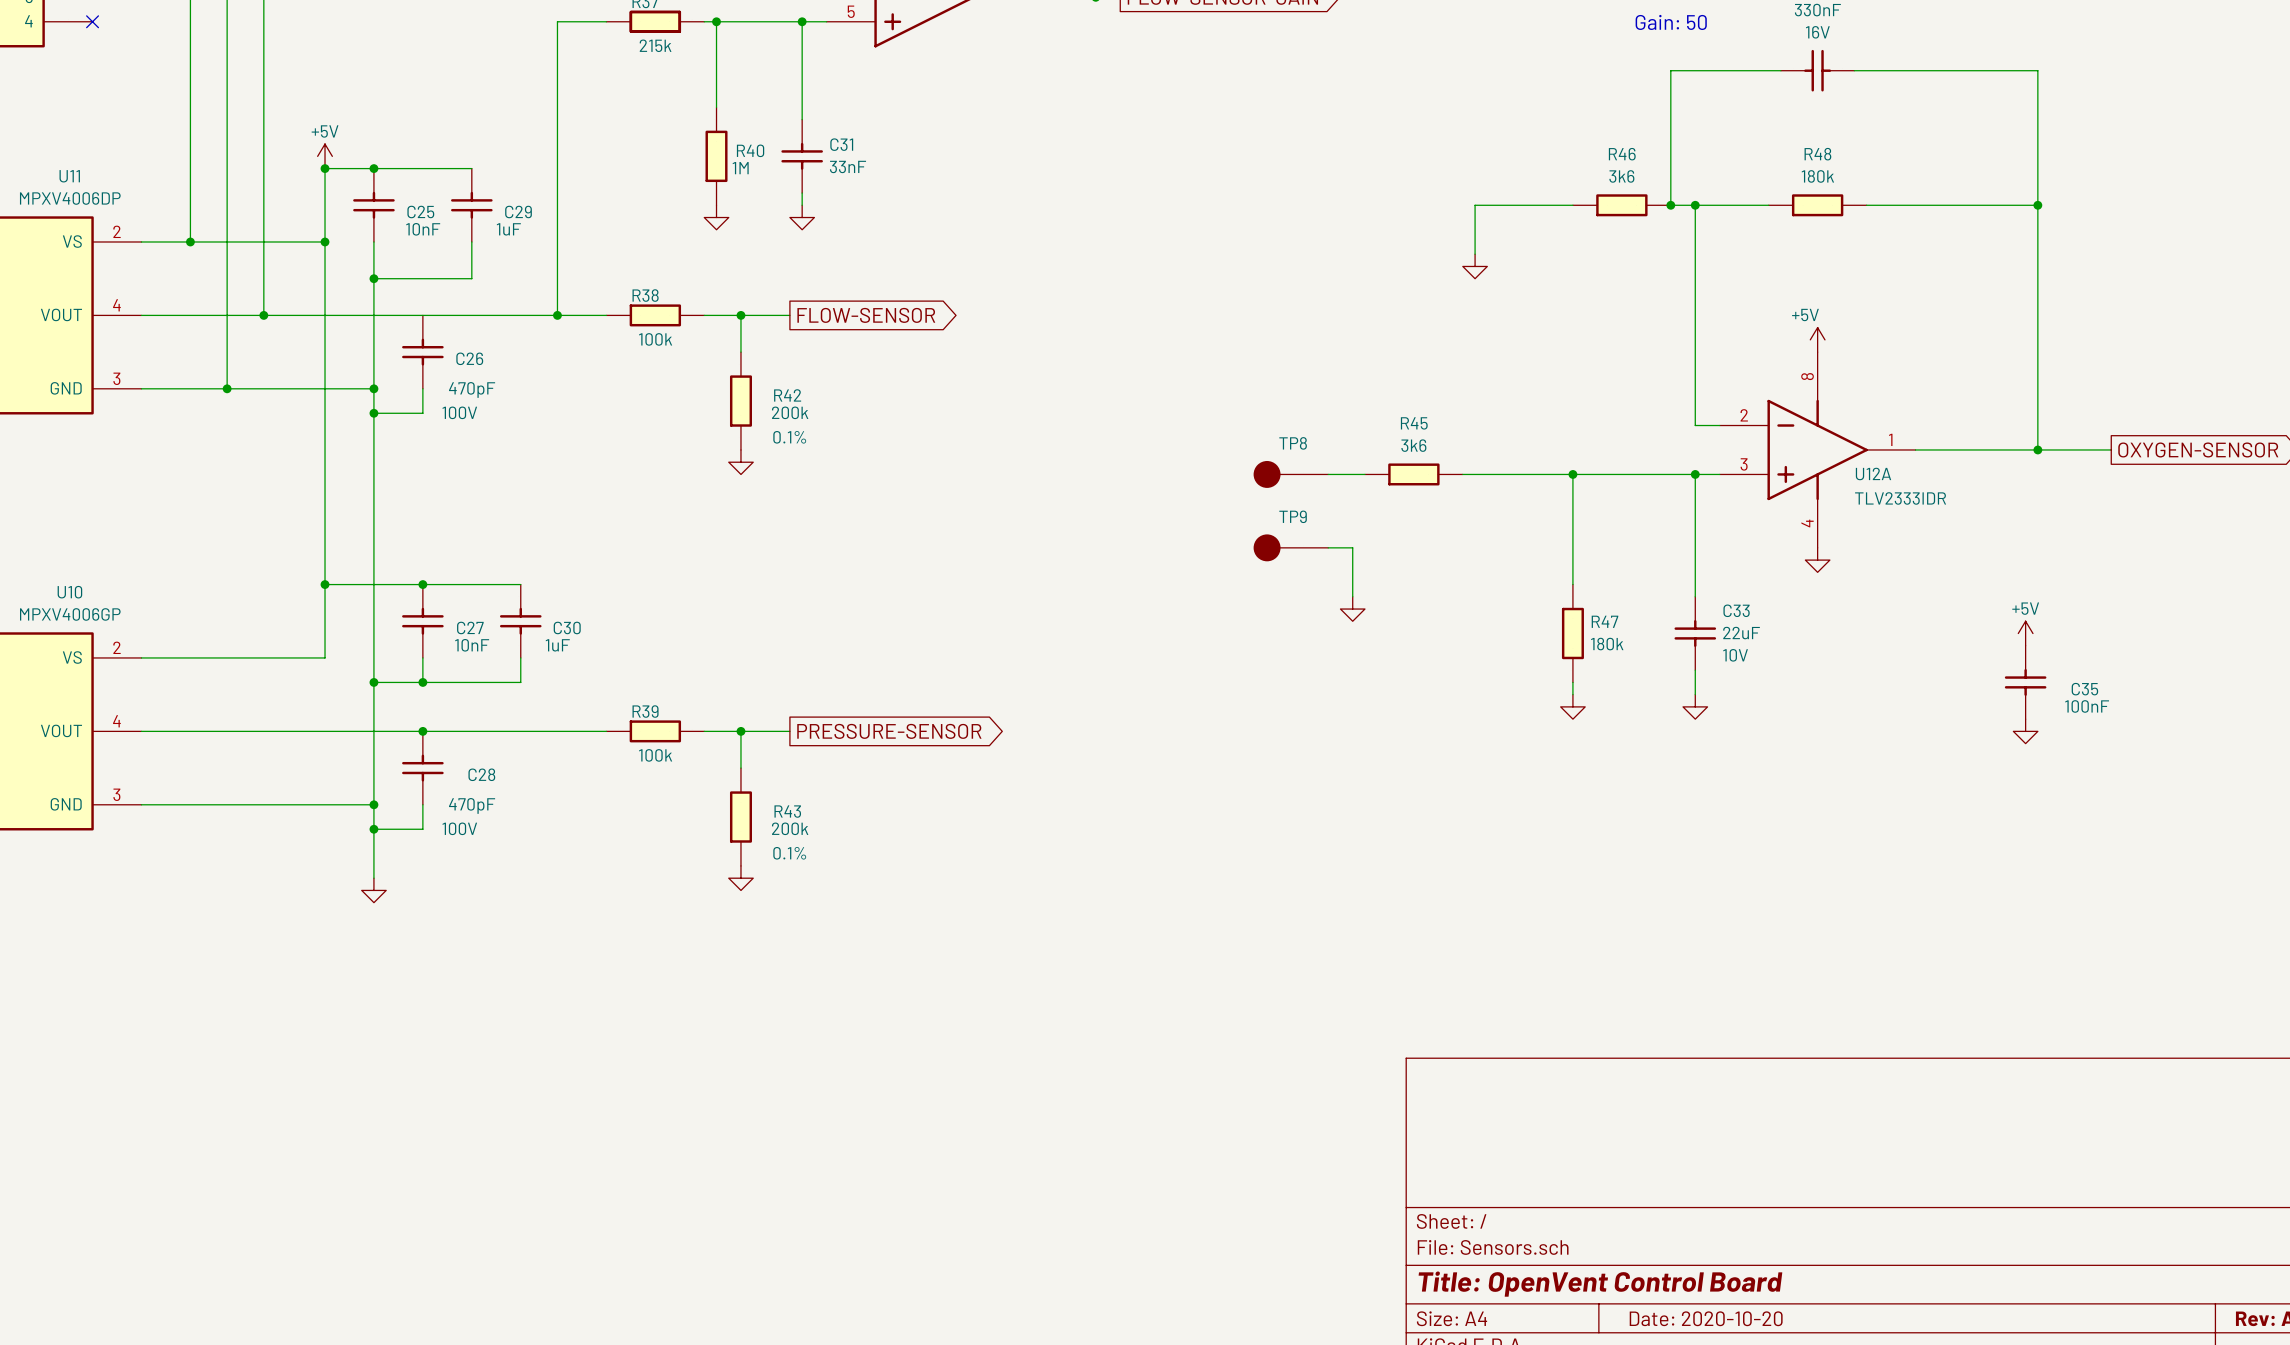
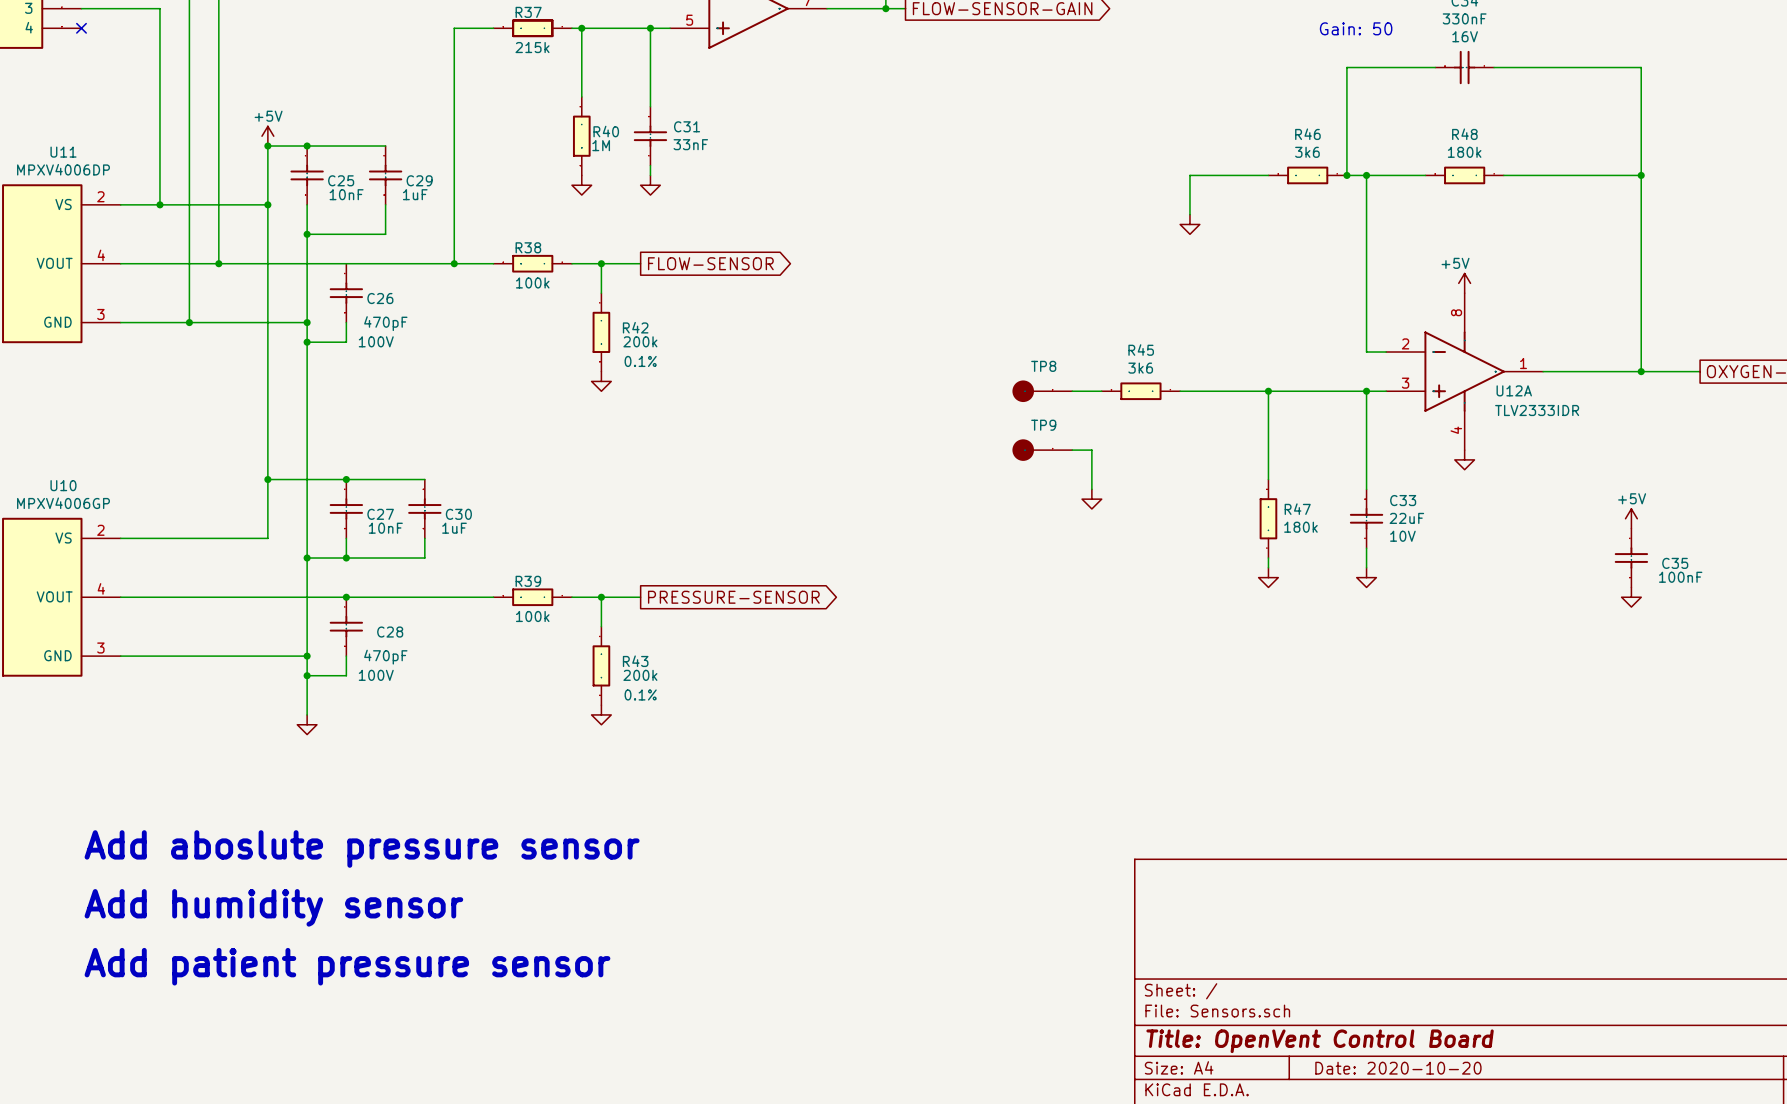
text: none -> Add aboslute pressure sensor (362, 848)
text: none -> Add humidity sensor (273, 907)
text: none -> Add patient pressure sensor (347, 966)

